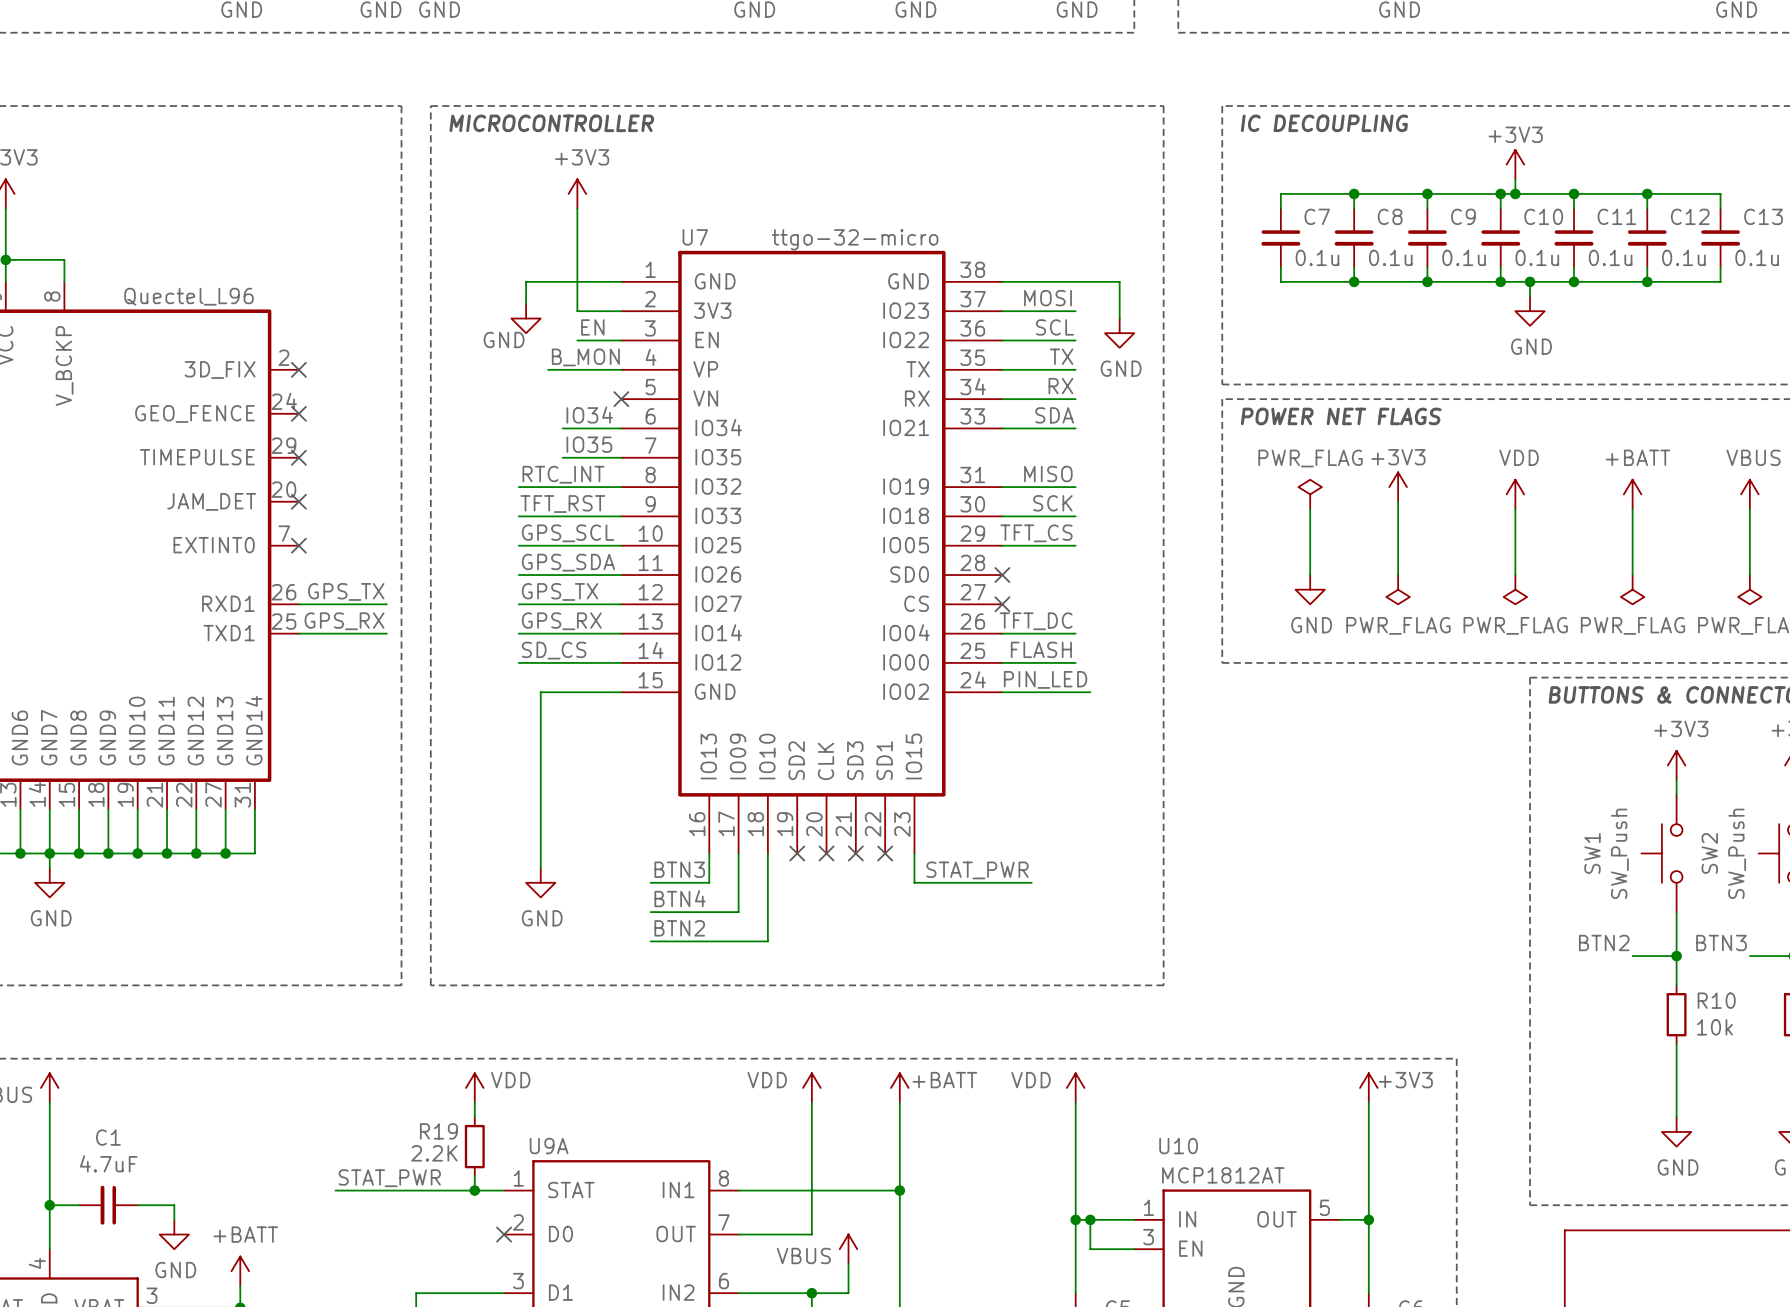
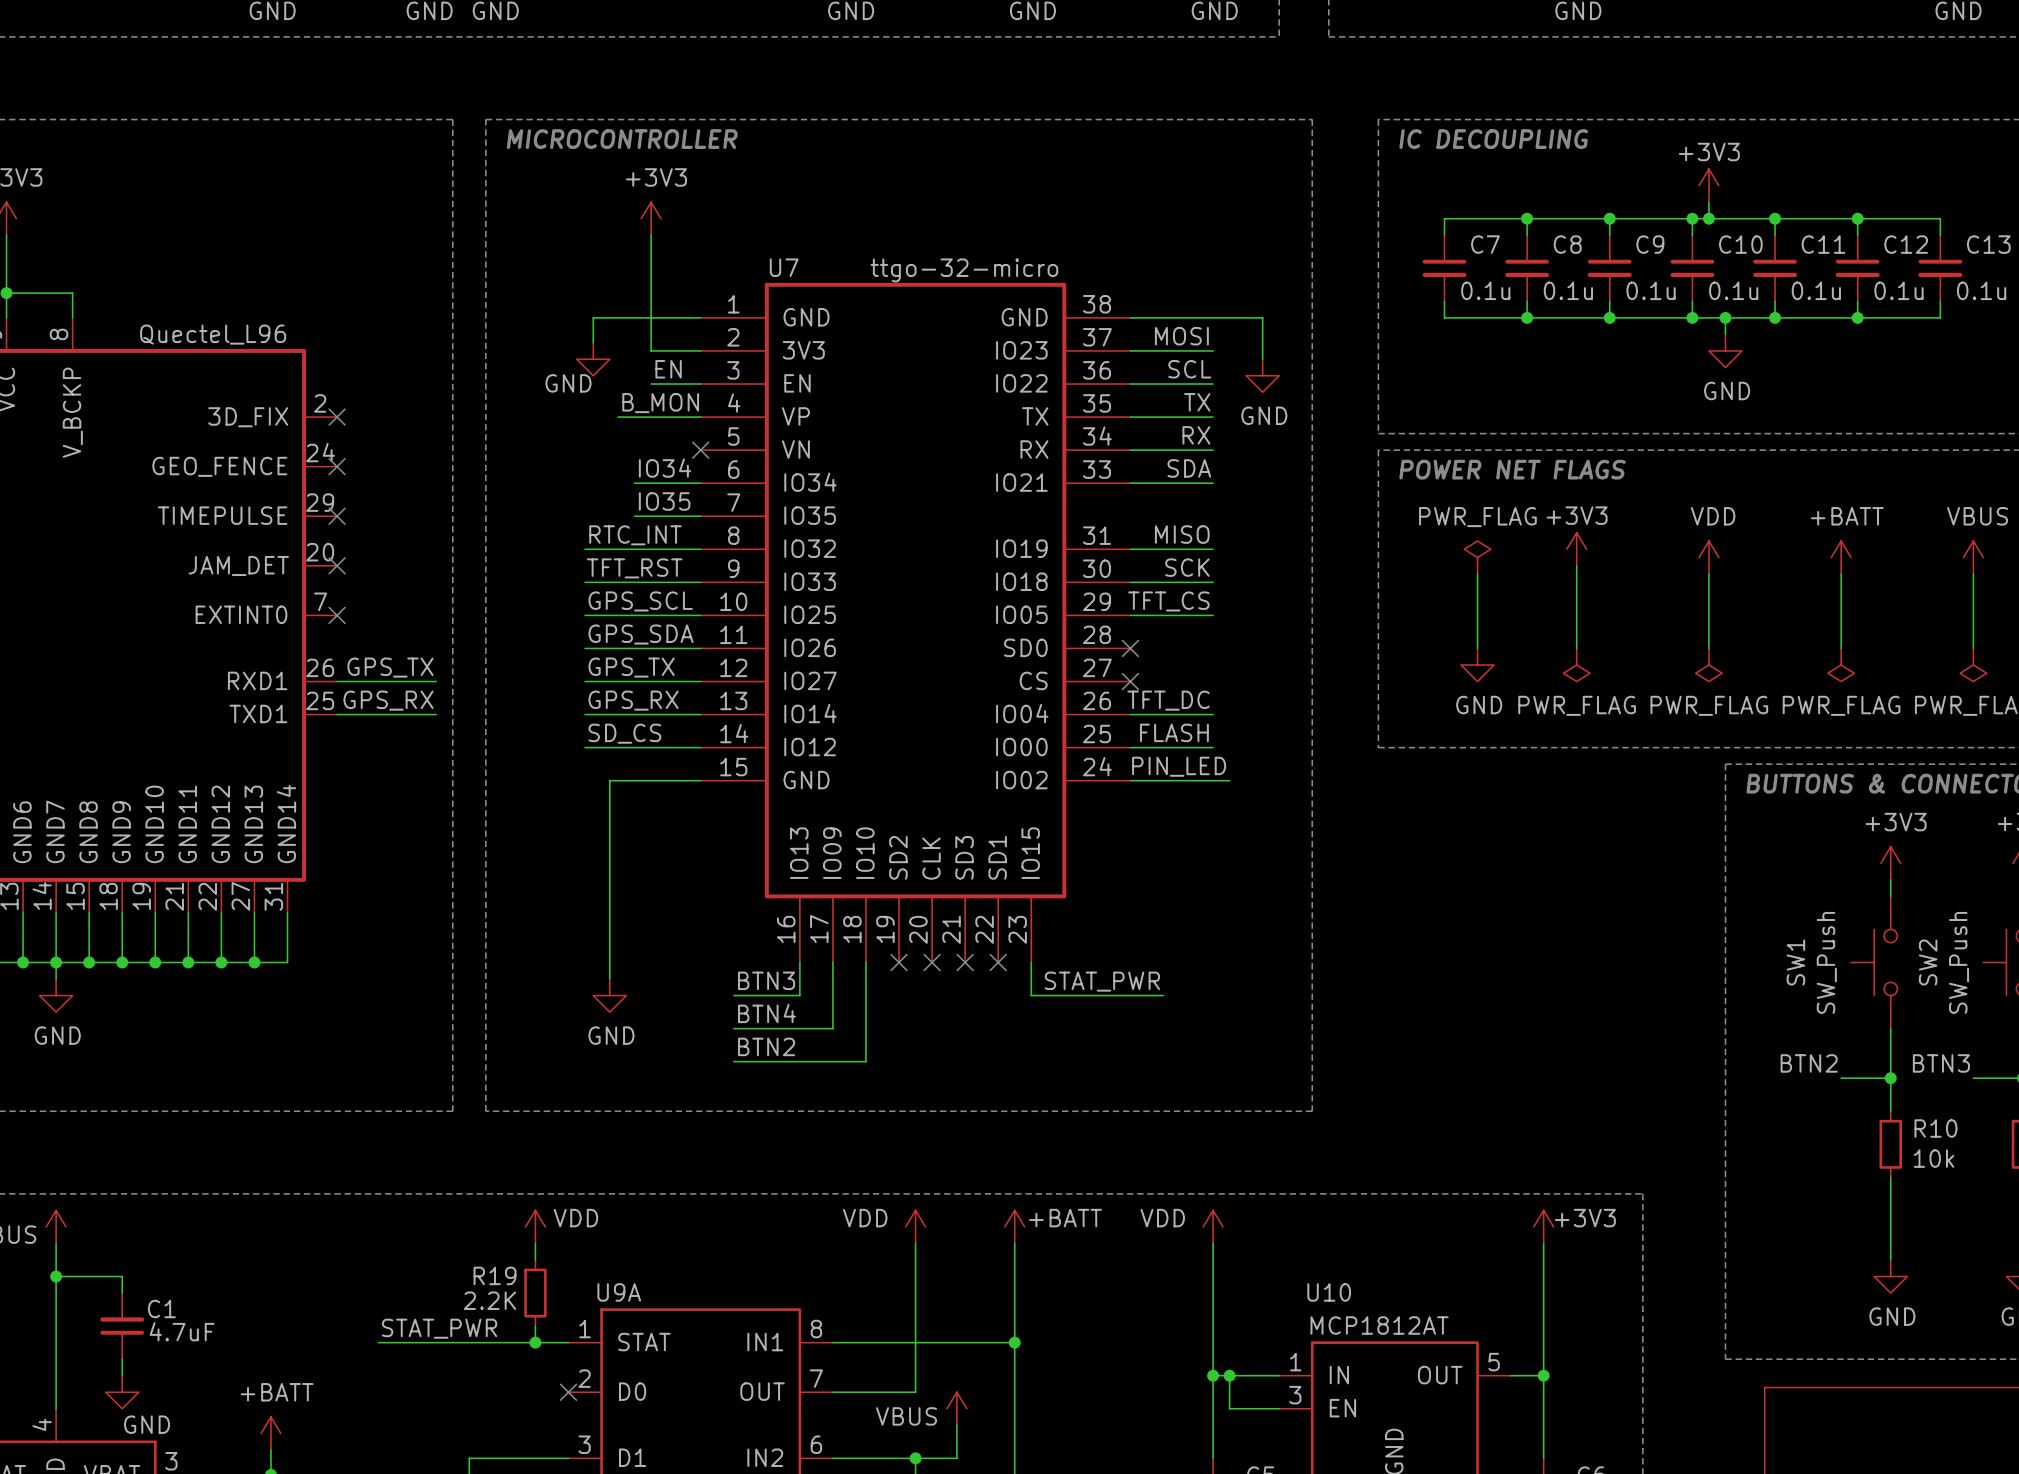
wire: none -> (56, 1276) (122, 1276) (122, 1293)
junction: none -> (56, 1276)
C1 name position: C1 (108, 1137) -> C1 (161, 1308)
wire: (49, 1205) (79, 1205) -> none
junction: (49, 1205) -> none
wire: none -> (122, 1359) (122, 1375)
C1 rotation: 0° (108, 1205) -> 90° clockwise (122, 1326)
wire: (137, 1205) (174, 1205) (174, 1219) -> none
power symbol position: GND (174, 1234) -> GND (122, 1392)
power symbol text position: GND (175, 1270) -> GND (147, 1424)

